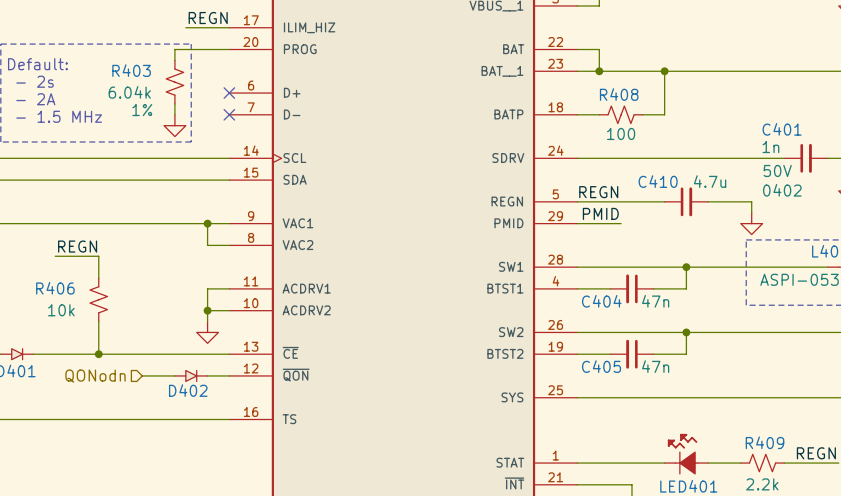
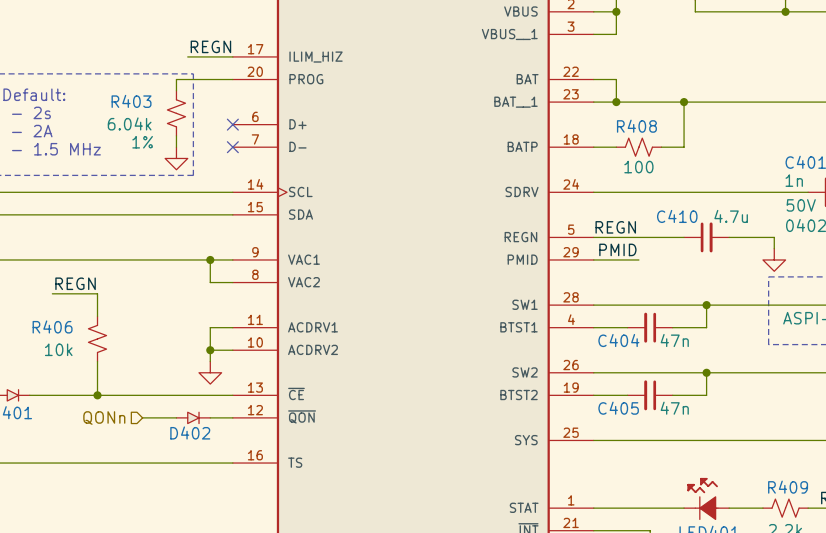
hierarchical label: QONodn (95, 376) -> QONn (104, 418)

